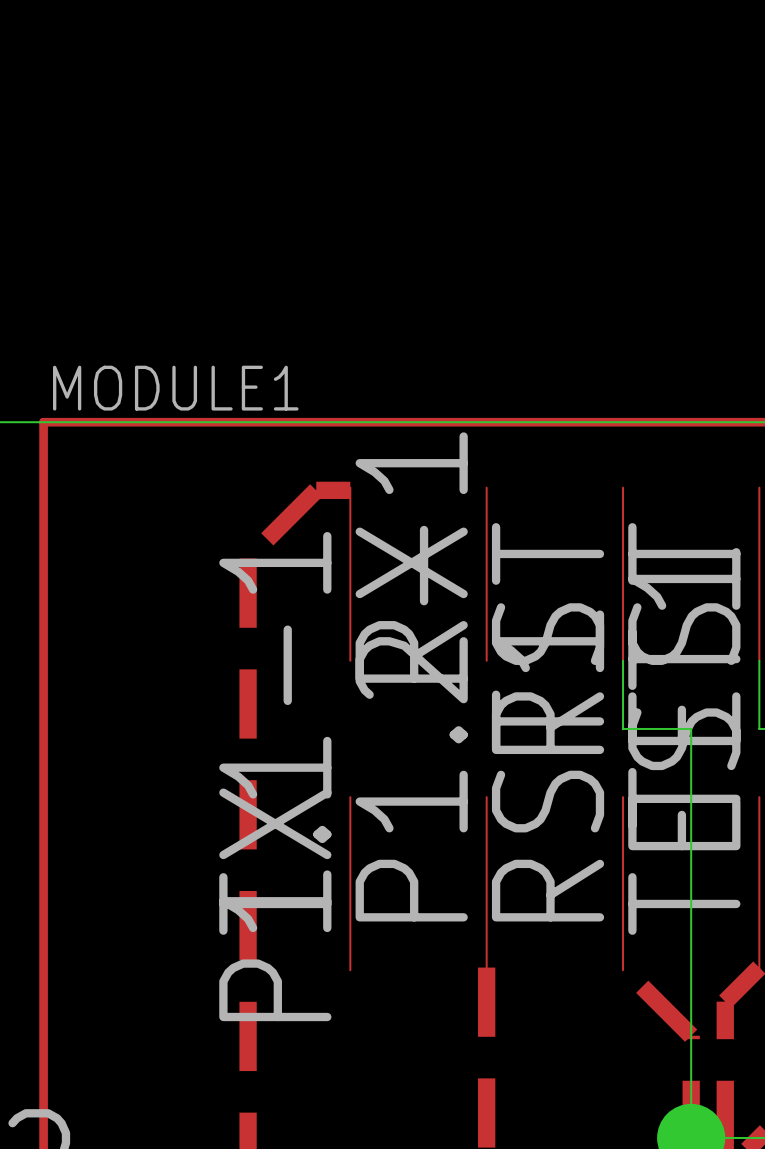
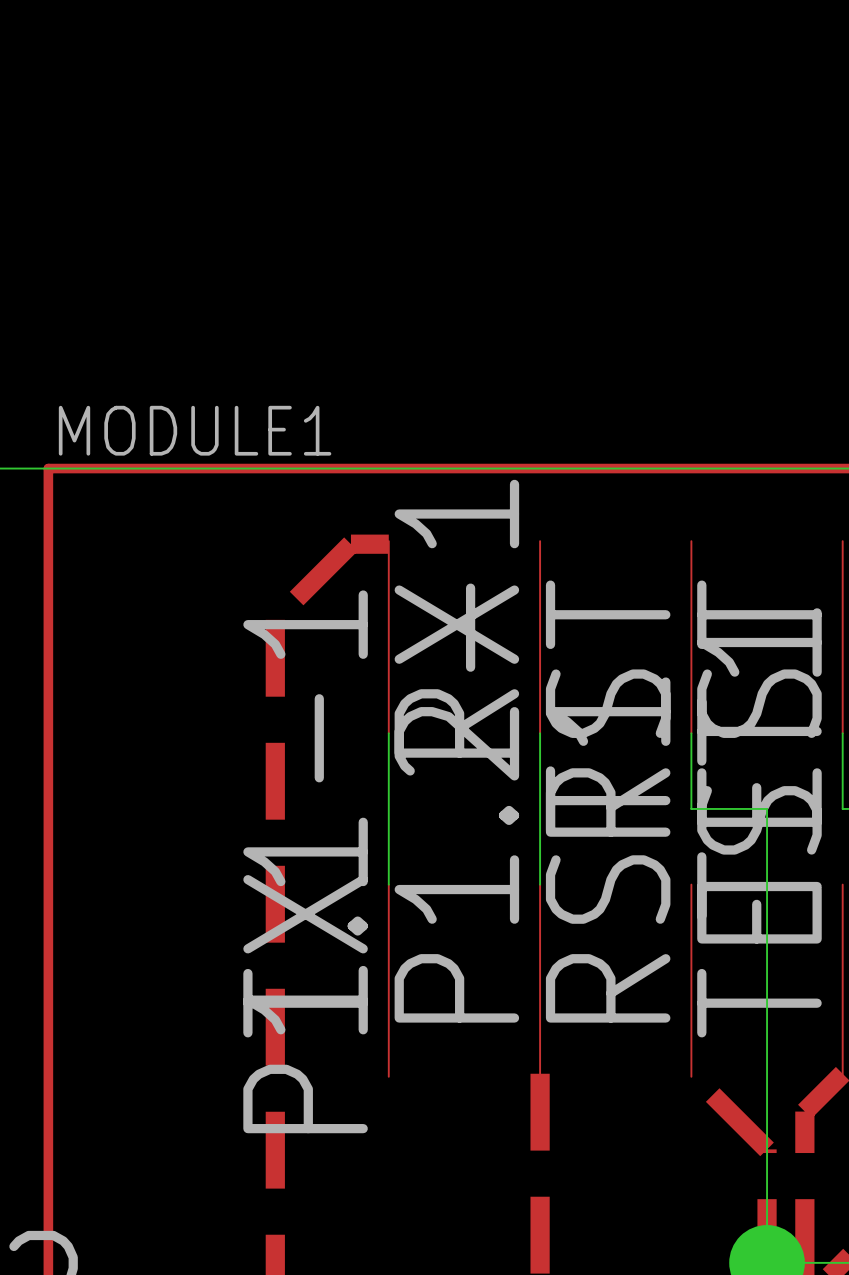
wire: none -> (388, 733) (388, 884)
wire: none -> (540, 733) (540, 884)

